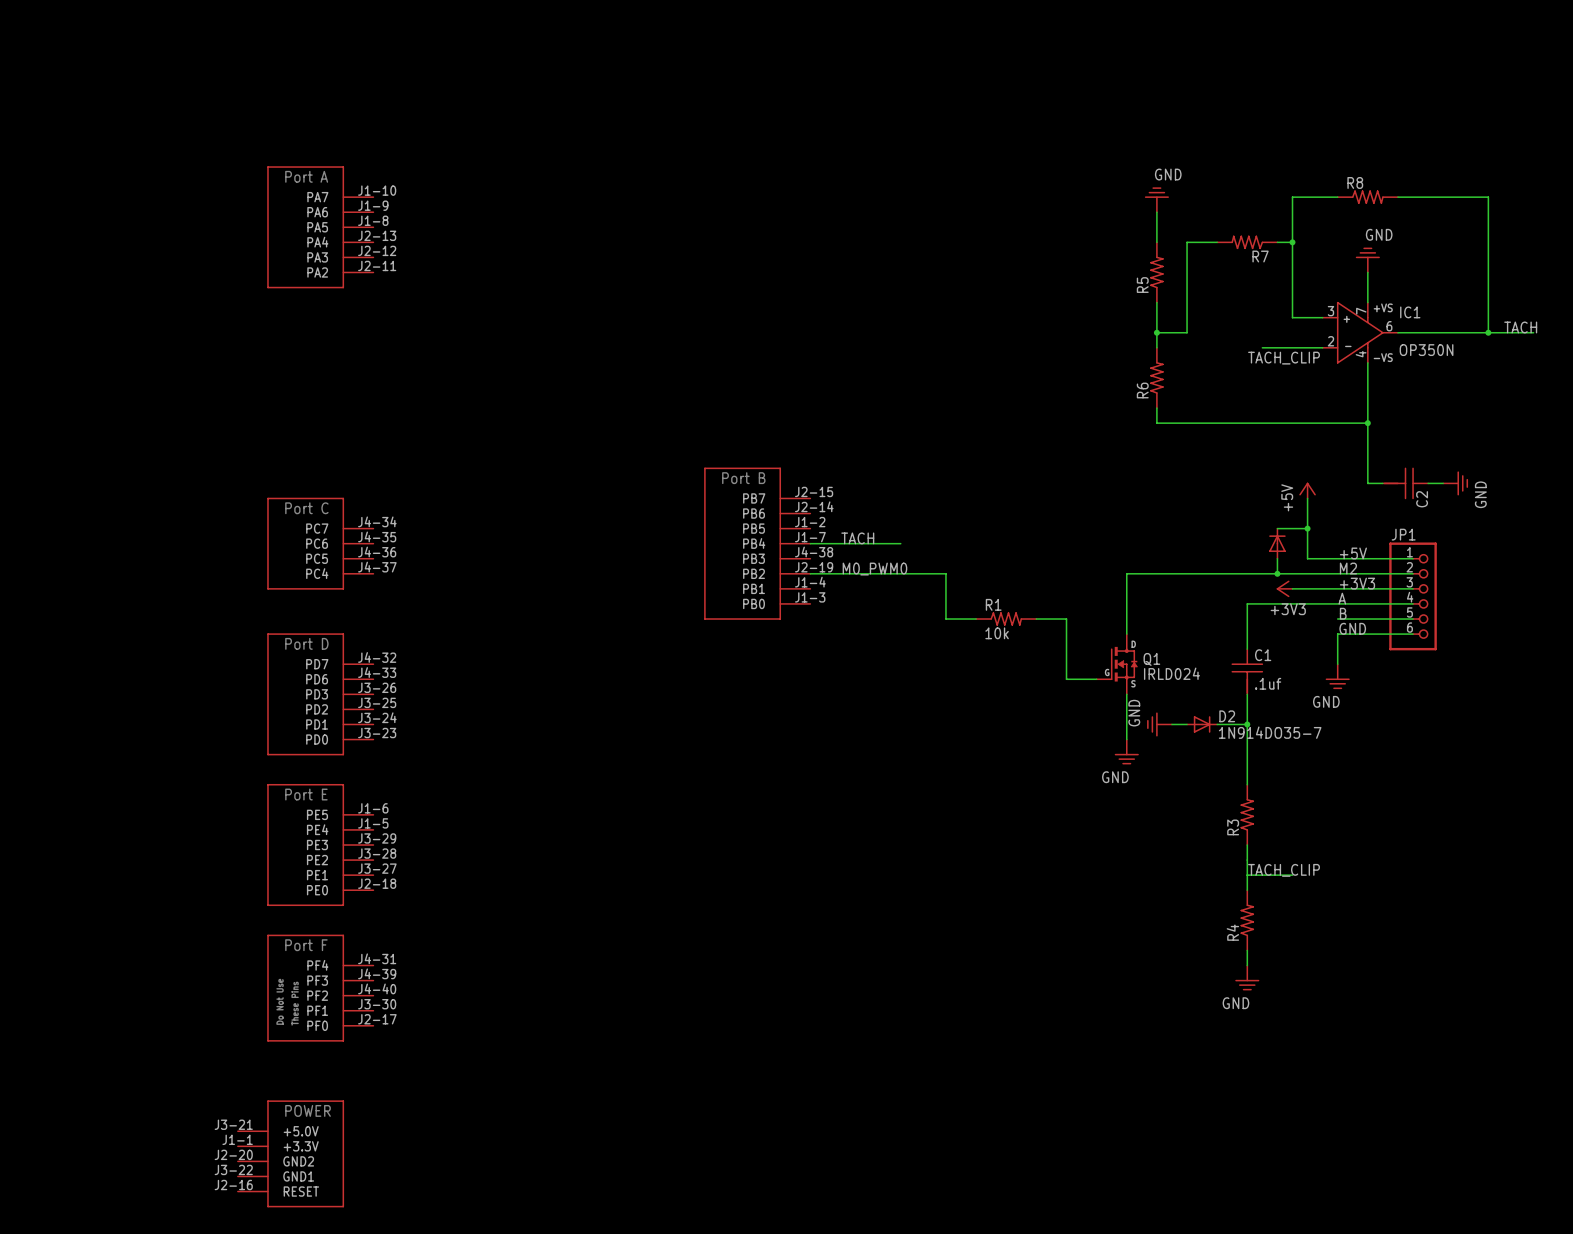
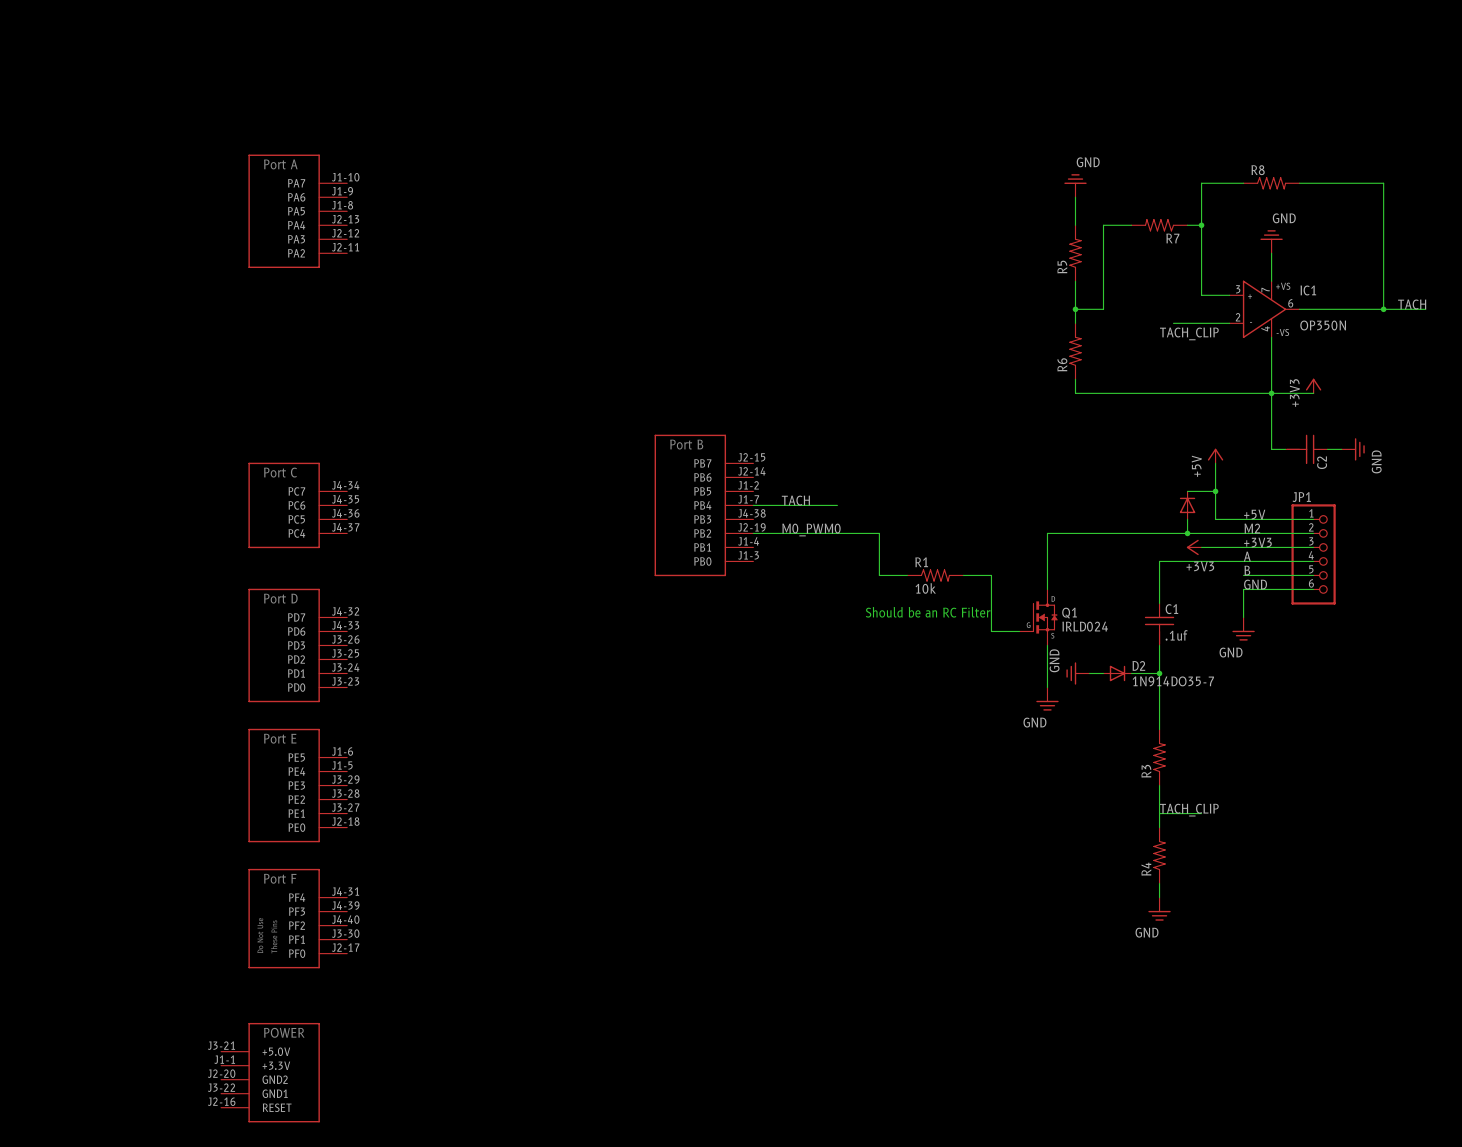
power symbol: none -> +3V3 (1313, 386)
wire: none -> (1271, 393) (1313, 393)
text: none -> Should be an RC Filter (928, 612)

